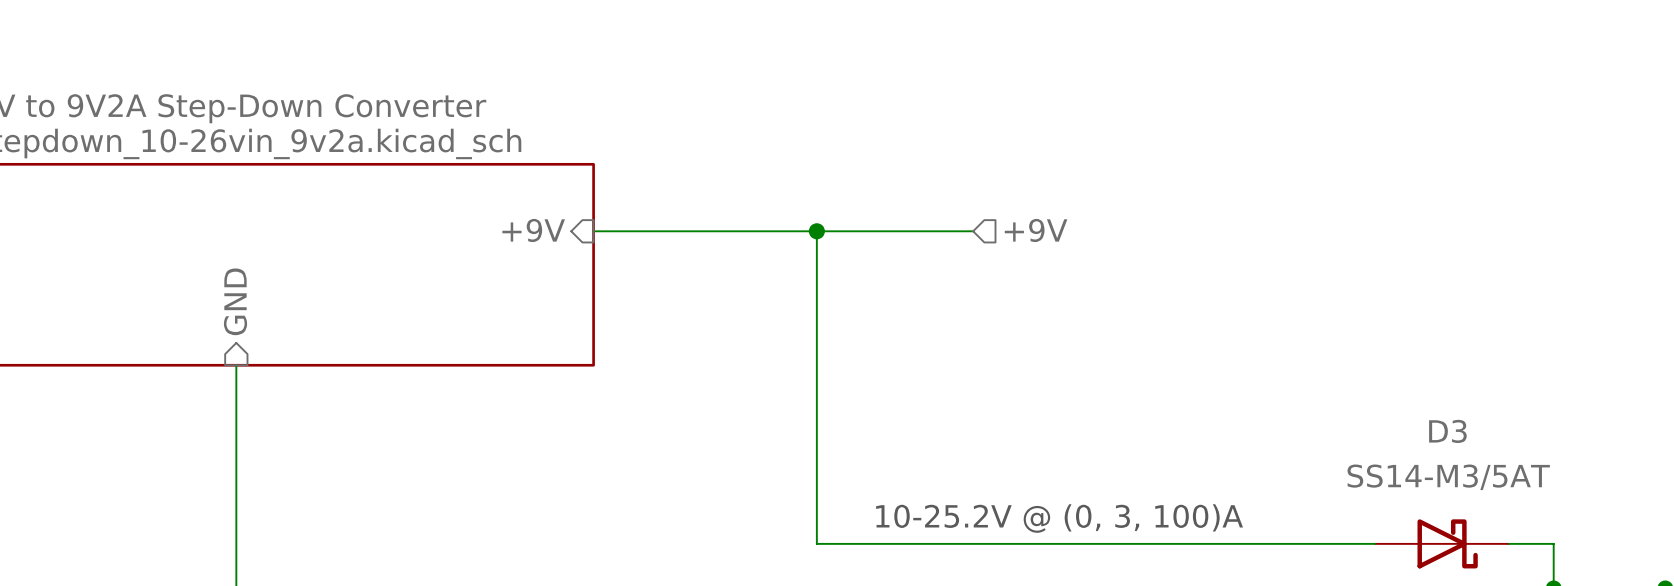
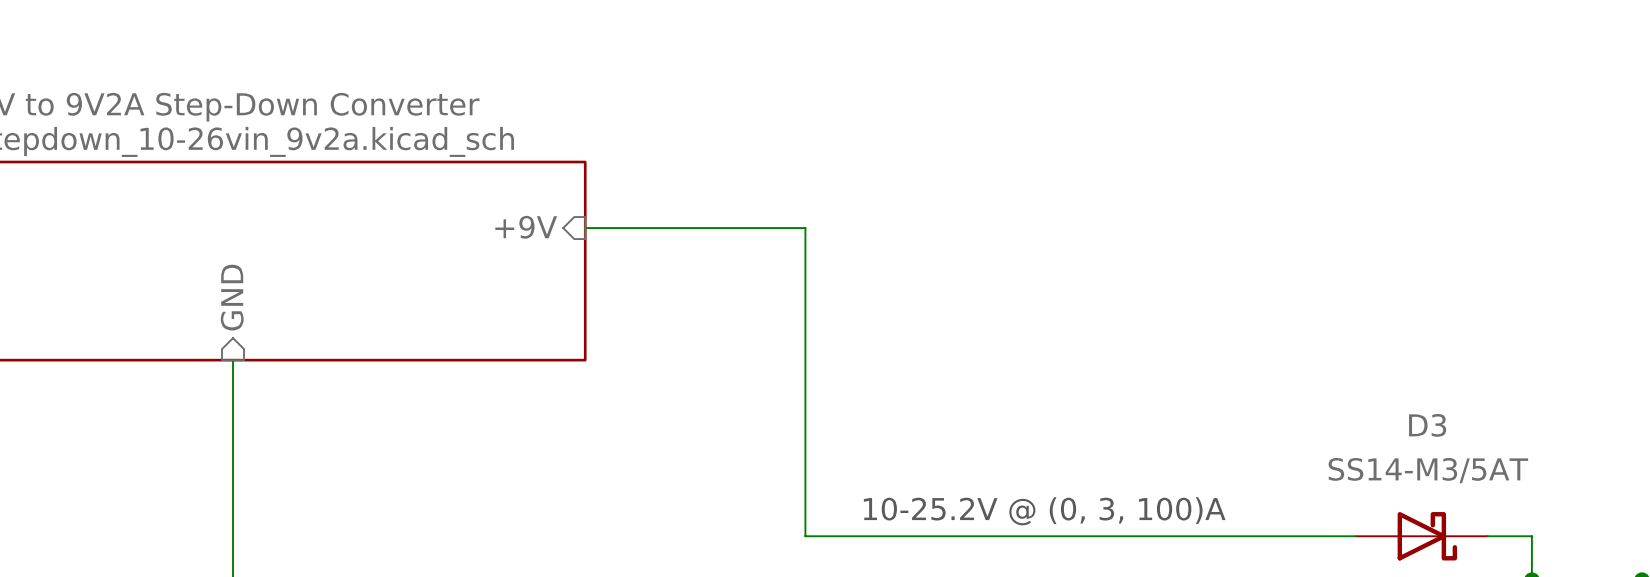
hierarchical label: +9V (1036, 230) -> none
wire: (816, 231) (973, 231) -> none
junction: (816, 231) -> none

